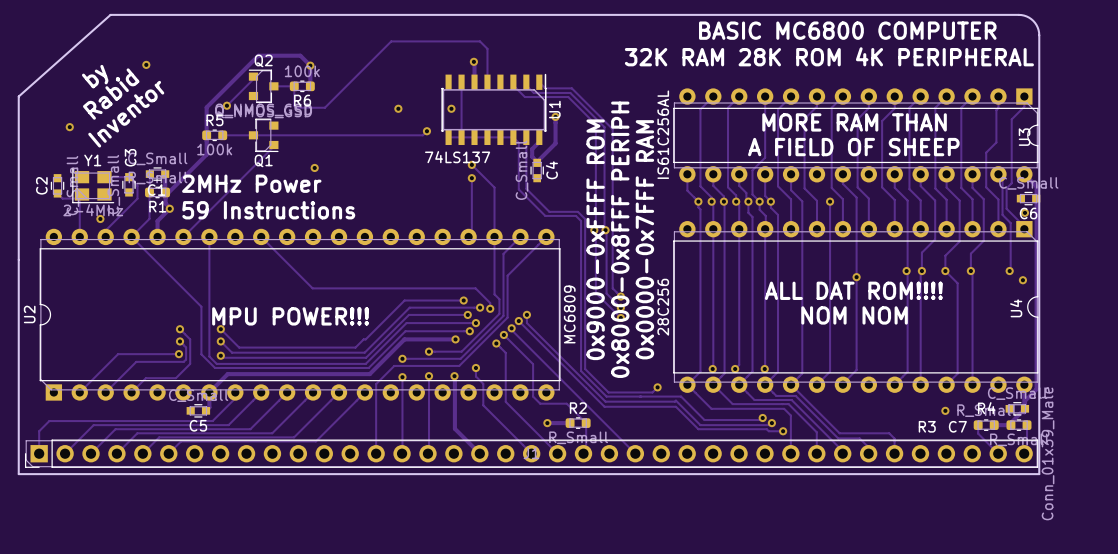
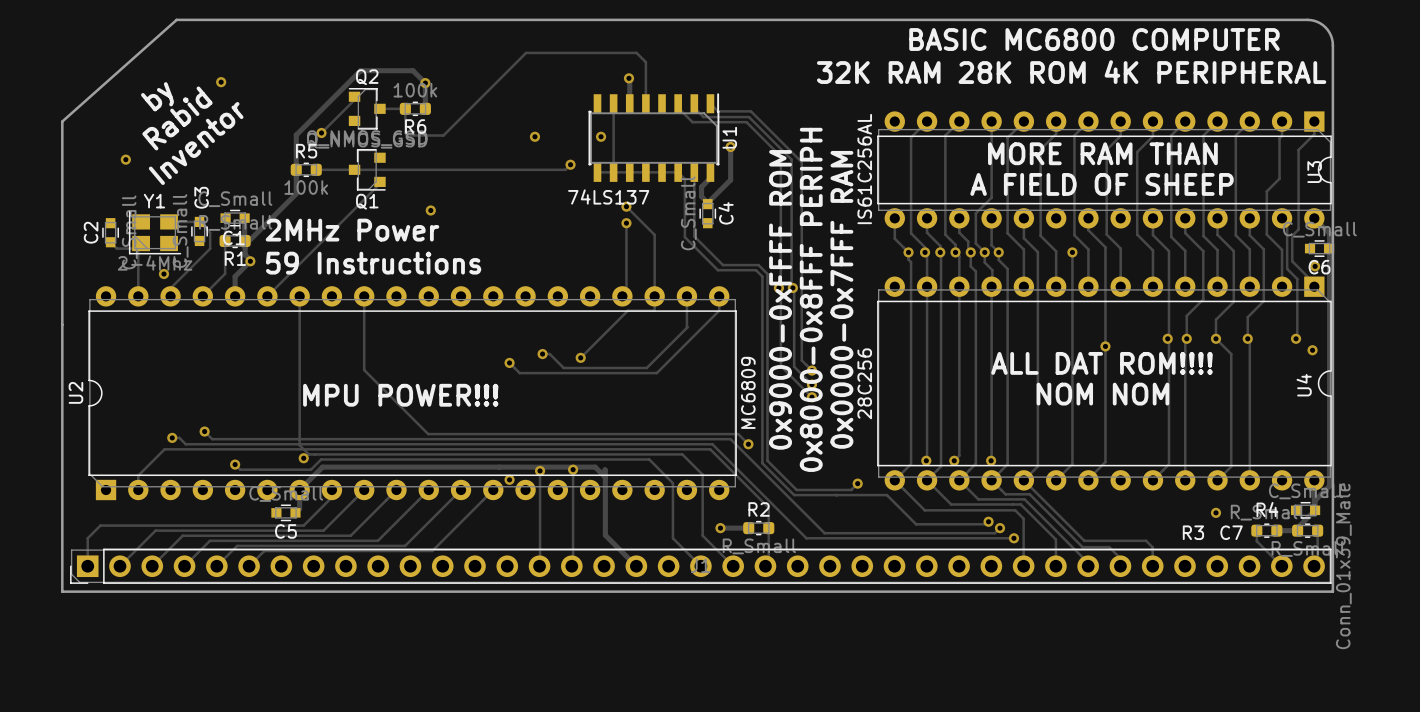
track: (131, 236) (201, 306) (201, 354) (215, 367) (226, 367) -> (235, 464) (240, 469) (311, 469) (321, 459)
track: (261, 236) (312, 288) (475, 288) (490, 303) (490, 308) -> none
track: (520, 236) (503, 253) (503, 315) (460, 358) (402, 358) -> (686, 296) (687, 327) (646, 368) (563, 368) (549, 354) (542, 354)
track: (546, 236) (507, 275) (507, 317) (459, 365) (394, 365) (376, 384) (376, 453) -> (719, 296) (719, 310) (656, 373) (519, 373) (509, 362)
track: (494, 248) (494, 294) (499, 299) (499, 313) (461, 351) -> (654, 310) (627, 310) (580, 357)
via: none -> (542, 354)
via: none -> (580, 357)
via: none -> (509, 362)
track: (463, 300) (404, 300) (355, 347) -> (748, 444) (738, 434) (481, 434)
via: (463, 300) -> none
track: (480, 307) (409, 307) (364, 352) (232, 352) (220, 341) -> none
via: (480, 307) -> none
via: (490, 308) -> none
track: (467, 314) (408, 314) (366, 357) (222, 357) (220, 355) -> none
via: (467, 314) -> none
track: (526, 314) (526, 323) (555, 351) -> (613, 439) (730, 439)
via: (526, 314) -> none
track: (518, 321) (604, 406) (675, 406) (698, 429) (766, 429) (768, 431) -> (172, 437) (179, 437) (185, 444) (712, 444) (806, 538) (996, 538)
via: (518, 321) -> none
track: (475, 323) (406, 323) (365, 363) -> (702, 474) (682, 454) (494, 454)
via: (475, 323) -> none
track: (511, 328) (635, 453) -> none
via: (511, 328) -> none
track: (179, 329) (190, 339) (190, 363) (175, 378) (145, 378) (131, 392) -> none
via: (179, 329) -> none
track: (220, 329) (239, 347) (312, 347) -> (364, 296) (364, 370) (428, 434)
via: (220, 329) -> none
track: (469, 331) (405, 331) (368, 367) -> none
via: (469, 331) -> none
track: (503, 334) (533, 364) (533, 380) -> none
via: (503, 334) -> none
track: (455, 339) (404, 339) (369, 374) -> (605, 477) (595, 467) (499, 467)
via: (455, 339) -> none
track: (179, 341) (186, 347) (186, 359) (183, 361) (136, 361) (105, 392) -> none
via: (179, 341) -> none
via: (220, 341) -> none
track: (496, 343) (505, 352) (505, 401) (533, 429) -> none
via: (496, 343) -> none
track: none -> (204, 431) (212, 439) (573, 439)
via: none -> (204, 431)
via: none -> (172, 437)
via: (429, 351) -> none
track: (178, 354) (118, 354) (79, 392) -> (768, 528) (768, 507) (710, 449) (164, 449) (138, 475) (138, 490)
via: (178, 354) -> none
via: (220, 355) -> none
via: none -> (748, 444)
via: (402, 358) -> none
via: none -> (303, 458)
track: (475, 367) (475, 376) (483, 383) (483, 405) (509, 431) -> (498, 459) (649, 459) (672, 483) (672, 538)
via: (475, 367) -> none
via: none -> (235, 464)
via: (454, 376) -> none
via: none -> (509, 479)
track: (533, 396) (540, 403) (566, 403) (586, 423) -> (702, 495) (702, 535)
track: (605, 401) (675, 400) (700, 425) (769, 425) -> (792, 501) (824, 533) (994, 533) (997, 530)

